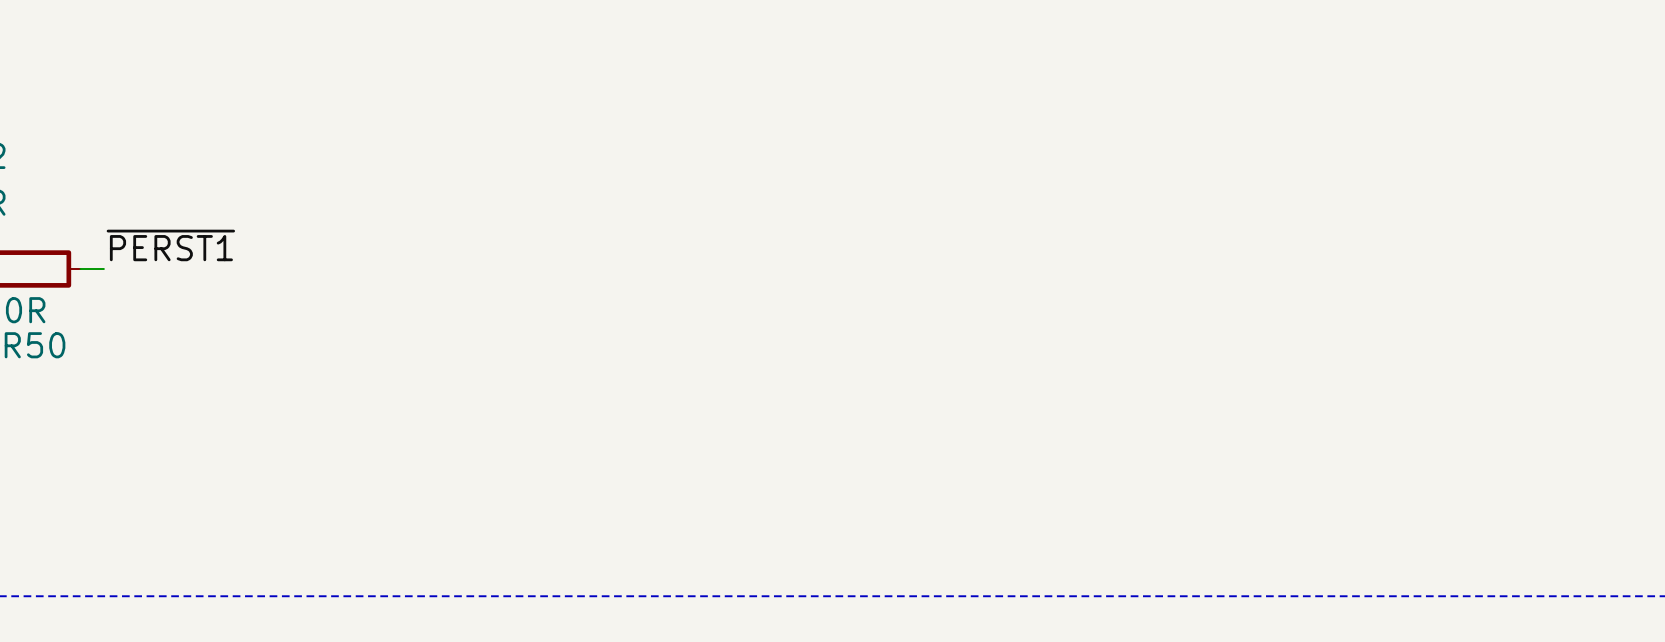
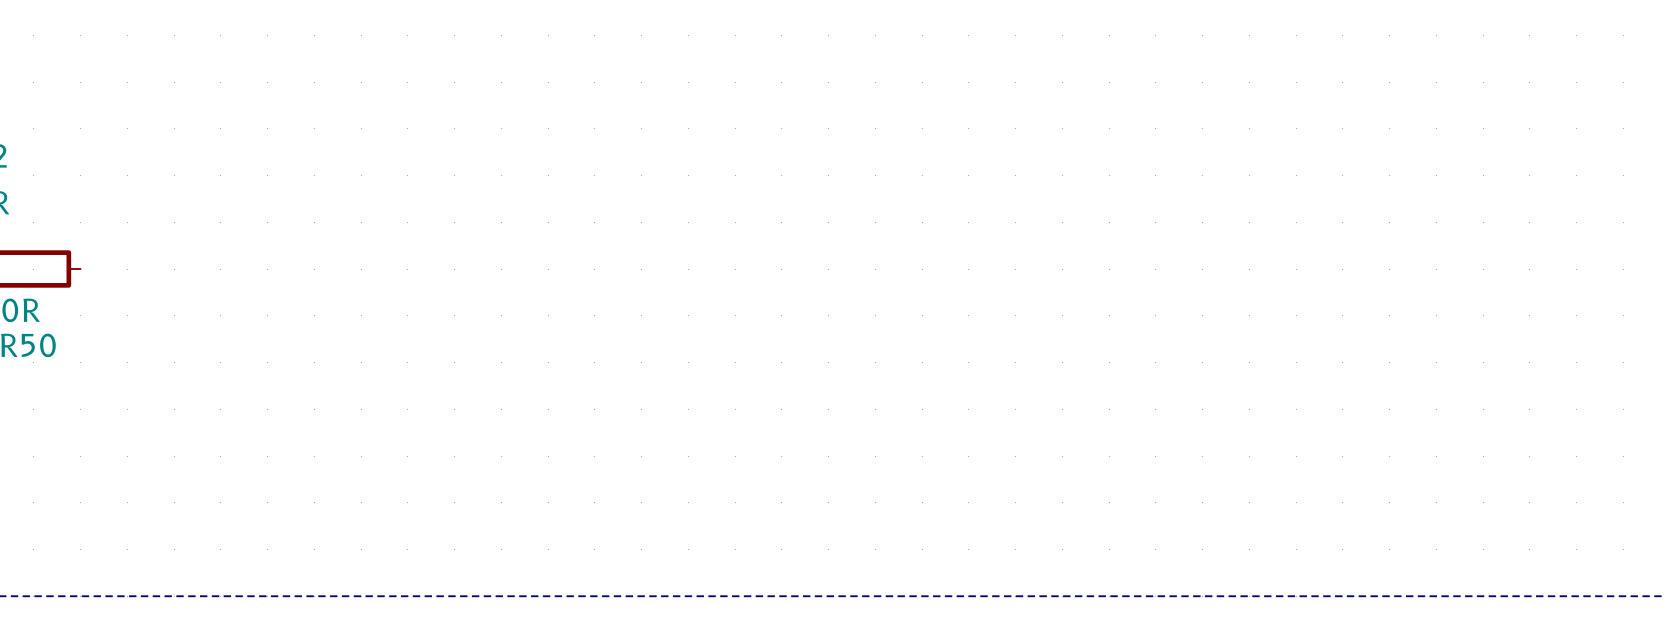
label: ~{PERST1} (170, 245) -> none
wire: (80, 269) (103, 269) -> none

